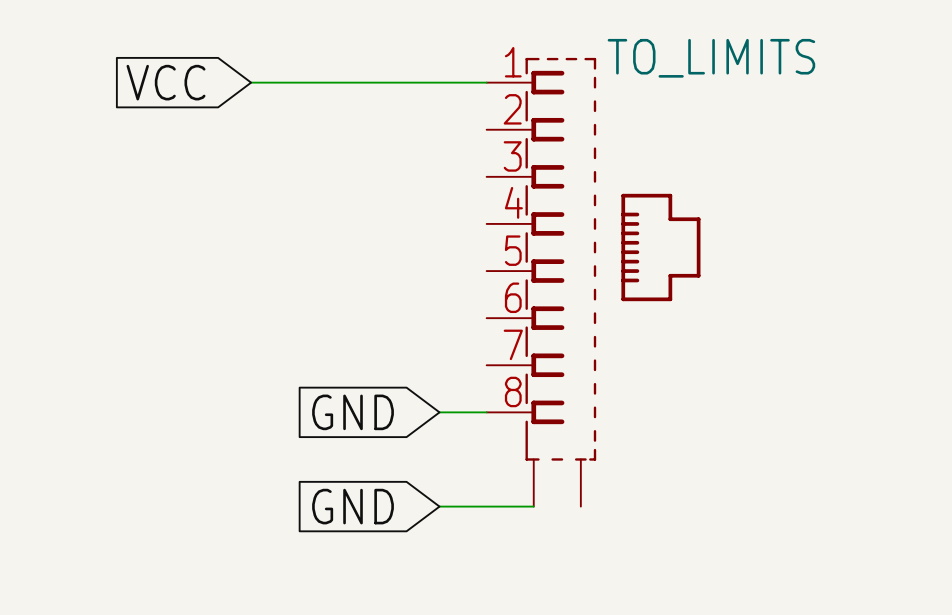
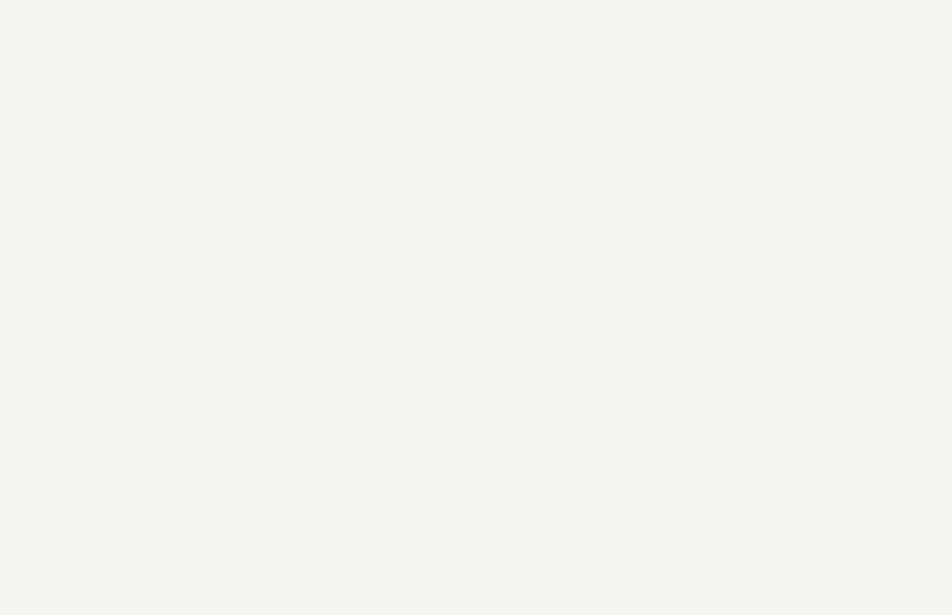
global label: VCC (166, 82) -> none
wire: (251, 82) (486, 82) -> none
TO_LIMITS: (593, 282) -> none
global label: GND (353, 412) -> none
wire: (439, 412) (486, 412) -> none
global label: GND (353, 506) -> none
wire: (439, 506) (533, 506) -> none

